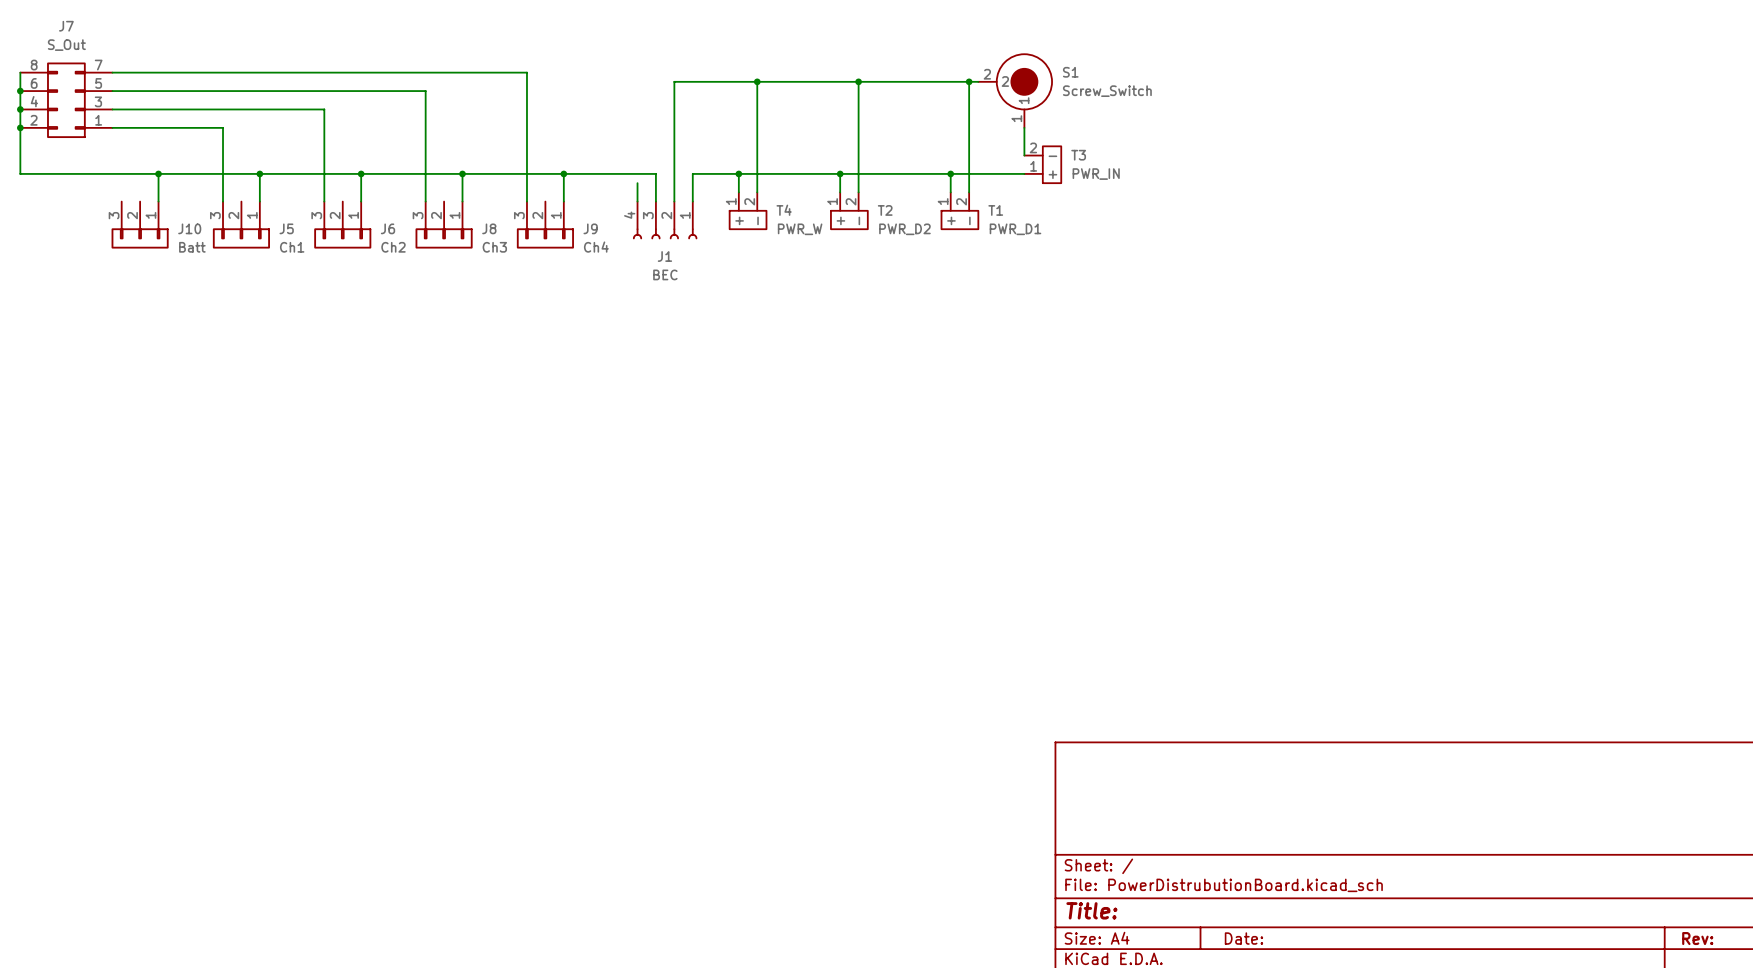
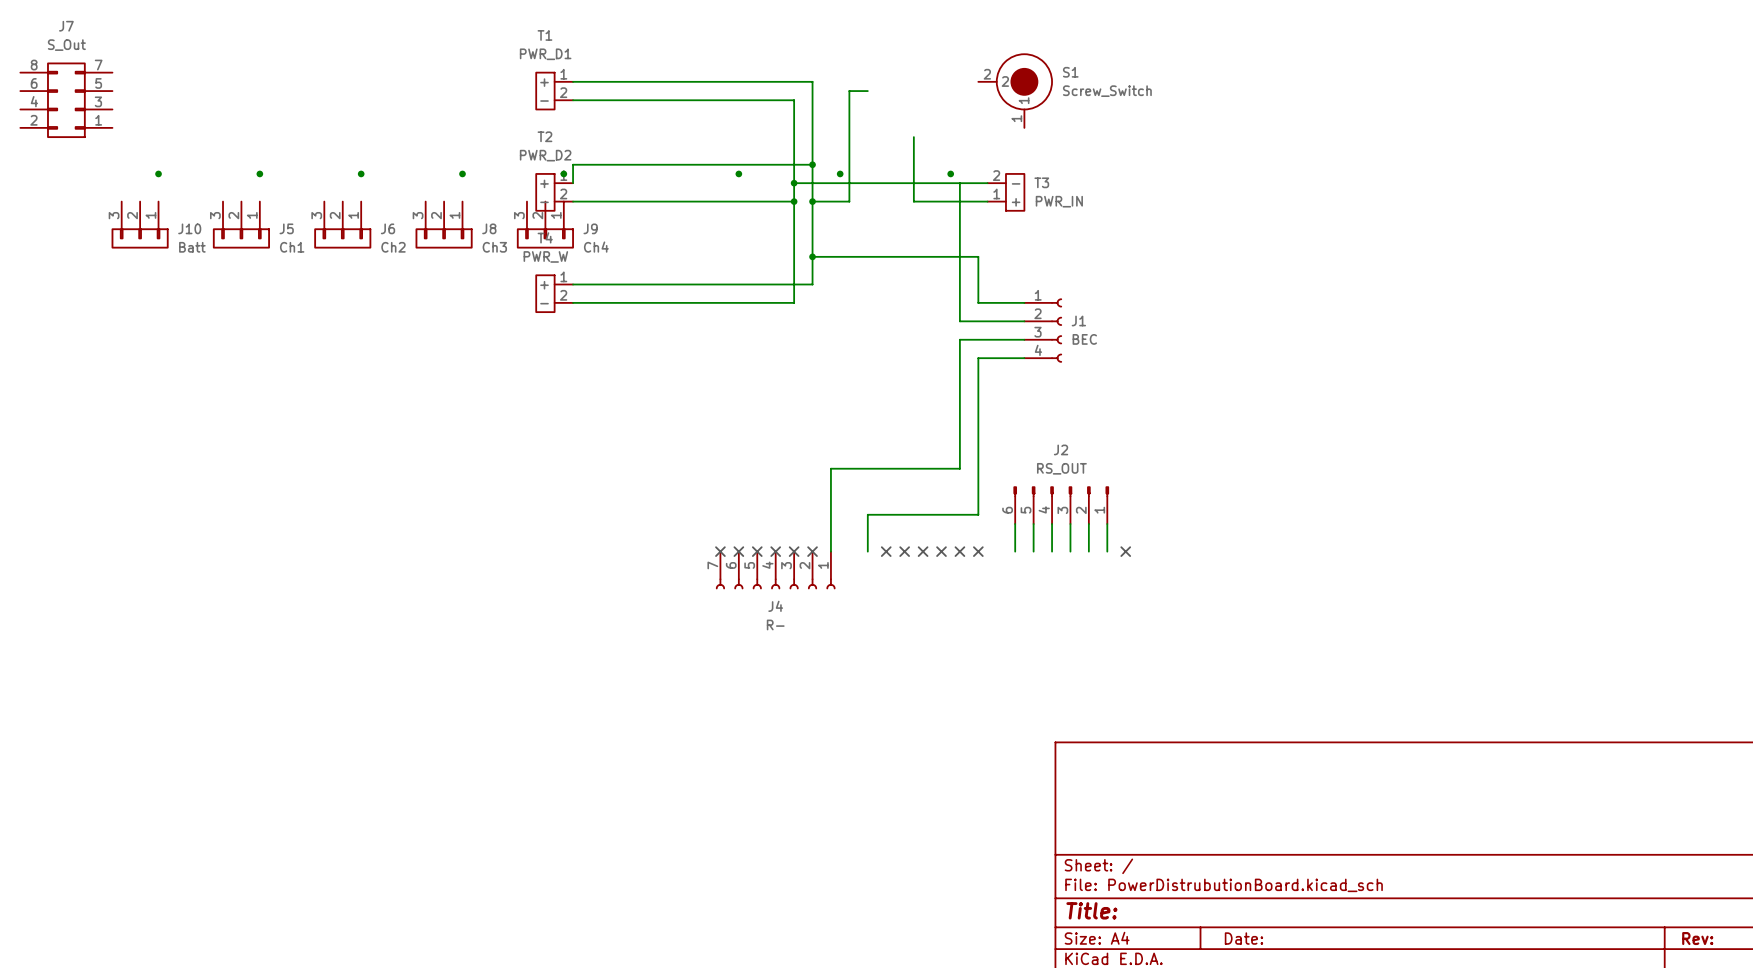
wire: (20, 72) (20, 173) (655, 173) (655, 201) -> none
wire: (112, 72) (526, 72) (526, 201) -> none
wire: (674, 81) (674, 201) -> (674, 81) (573, 81)
wire: (757, 81) (757, 192) -> none
junction: (757, 81) -> none
wire: (812, 81) (978, 81) -> (812, 81) (812, 284) (573, 284)
wire: (858, 81) (858, 192) -> none
junction: (858, 81) -> none
wire: (969, 81) (969, 192) -> none
junction: (969, 81) -> none
junction: (20, 91) -> none
wire: (112, 91) (425, 91) (425, 201) -> none
wire: none -> (867, 91) (849, 91) (849, 201) (812, 201)
wire: none -> (573, 100) (794, 100) (794, 302) (573, 302)
junction: (20, 109) -> none
wire: (112, 109) (324, 109) (324, 201) -> none
junction: (20, 127) -> none
wire: (112, 127) (223, 127) (223, 201) -> none
wire: (1024, 127) (1024, 155) -> none
wire: none -> (913, 137) (913, 201) (987, 201)
wire: none -> (812, 164) (573, 164) (573, 183)
junction: none -> (812, 164)
T3 position: (1042, 164) -> (1005, 192)
wire: (158, 173) (158, 201) -> none
wire: (259, 173) (259, 201) -> none
wire: (361, 173) (361, 201) -> none
wire: (462, 173) (462, 201) -> none
wire: (738, 173) (738, 192) -> none
wire: (840, 173) (840, 192) -> none
wire: (950, 173) (950, 192) -> none
wire: (1024, 173) (692, 173) (692, 201) -> none
wire: (637, 183) (637, 201) -> none
wire: none -> (794, 183) (987, 183)
junction: none -> (794, 183)
wire: none -> (959, 183) (959, 321) (1024, 321)
wire: none -> (573, 201) (794, 201)
junction: none -> (794, 201)
junction: none -> (812, 201)
T4 position: (748, 210) -> (554, 293)
T4 name position: T4 (784, 210) -> T4 (545, 237)
T2 position: (849, 210) -> (554, 192)
T2 name position: T2 (885, 210) -> T2 (544, 136)
T1 position: (959, 210) -> (554, 91)
T1 name position: T1 (995, 210) -> T1 (544, 35)
J1 position: (665, 220) -> (1043, 330)
T4 rotation: 0° (748, 220) -> 90° clockwise (545, 293)
T2 rotation: 0° (849, 220) -> 90° clockwise (545, 192)
T1 rotation: 0° (959, 220) -> 90° clockwise (545, 91)
T4 value position: PWR_W (800, 229) -> PWR_W (545, 256)
T2 value position: PWR_D2 (904, 229) -> PWR_D2 (545, 155)
T1 value position: PWR_D1 (1015, 229) -> PWR_D1 (545, 54)
J1 rotation: 0° (665, 233) -> 90° counterclockwise (1056, 330)
wire: none -> (812, 256) (978, 256) (978, 302) (1024, 302)
junction: none -> (812, 256)
J1 value position: BEC (665, 274) -> BEC (1084, 339)
wire: none -> (1024, 339) (959, 339) (959, 468) (830, 468) (830, 551)
wire: none -> (1024, 358) (978, 358) (978, 514) (867, 514) (867, 551)
J2: none -> RS_OUT (1061, 505)
wire: none -> (1015, 523) (1015, 551)
wire: none -> (1033, 523) (1033, 551)
wire: none -> (1052, 523) (1052, 551)
wire: none -> (1070, 523) (1070, 551)
wire: none -> (1088, 523) (1088, 551)
wire: none -> (1107, 523) (1107, 551)
no-connect mark: none -> (720, 551)
no-connect mark: none -> (738, 551)
no-connect mark: none -> (757, 551)
no-connect mark: none -> (775, 551)
no-connect mark: none -> (794, 551)
no-connect mark: none -> (812, 551)
no-connect mark: none -> (886, 551)
no-connect mark: none -> (904, 551)
no-connect mark: none -> (923, 551)
no-connect mark: none -> (941, 551)
no-connect mark: none -> (959, 551)
no-connect mark: none -> (978, 551)
no-connect mark: none -> (1125, 551)
J4: none -> R- (775, 570)

